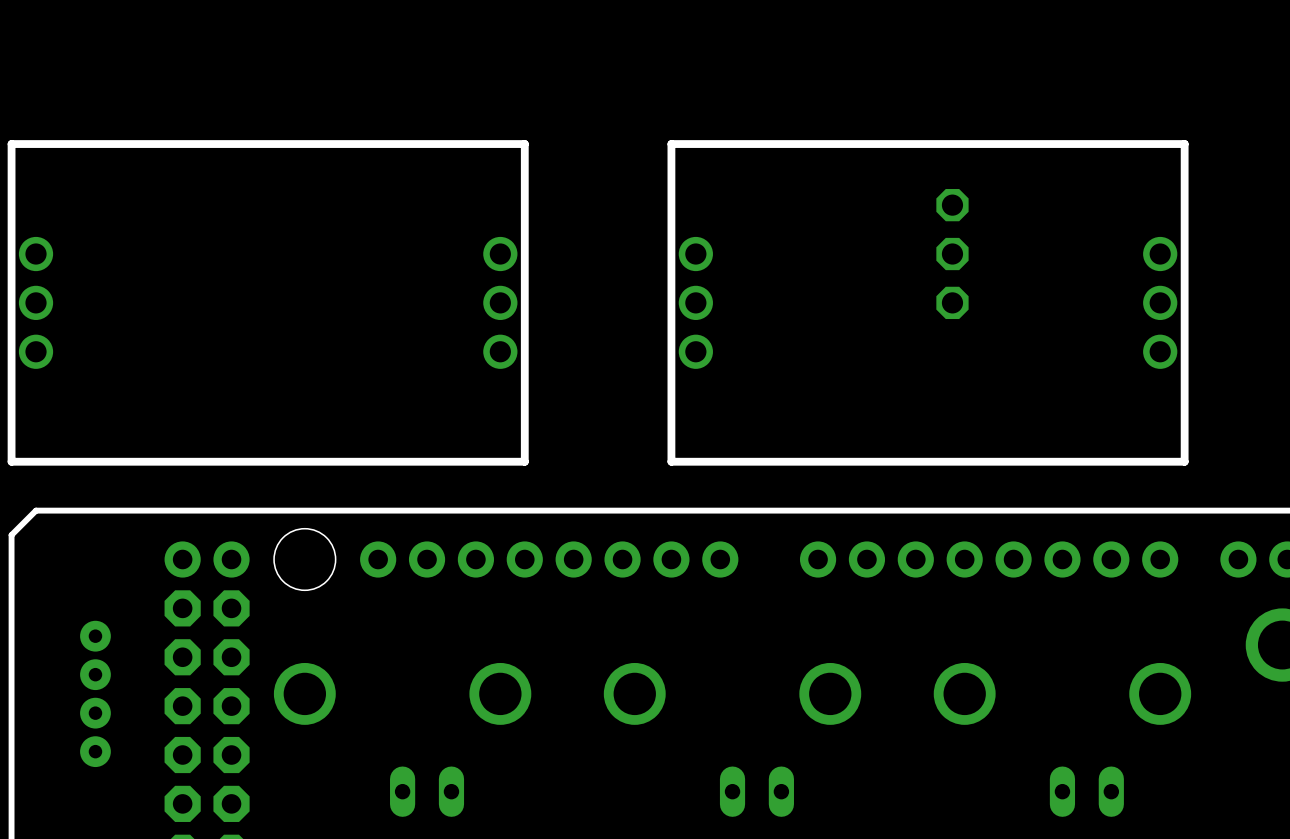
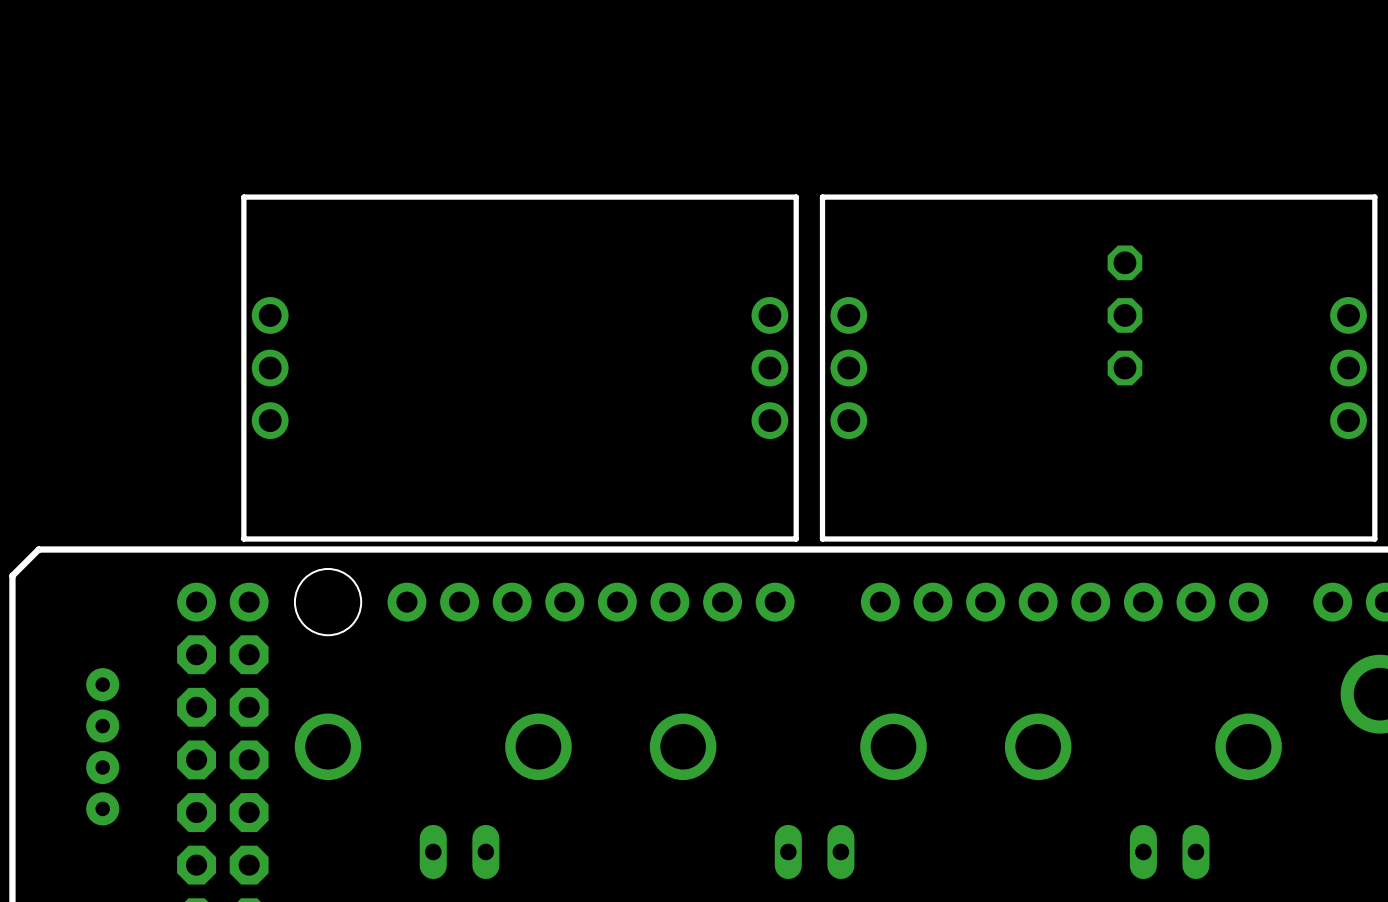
board edge: (524, 144) (11, 144) (11, 461) (524, 461) (524, 144) -> (796, 197) (243, 197) (243, 538) (796, 538) (796, 197)
board edge: (1184, 144) (1184, 461) (671, 461) (671, 144) (1184, 144) -> (1374, 197) (1374, 538) (822, 538) (822, 197) (1374, 197)
part position: (952, 254) -> (1124, 315)
part: (36, 302) -> none
part: (500, 302) -> none
part position: (695, 302) -> (769, 368)
part position: (1160, 302) -> (1348, 368)
part: none -> (270, 368)
part: none -> (848, 368)

